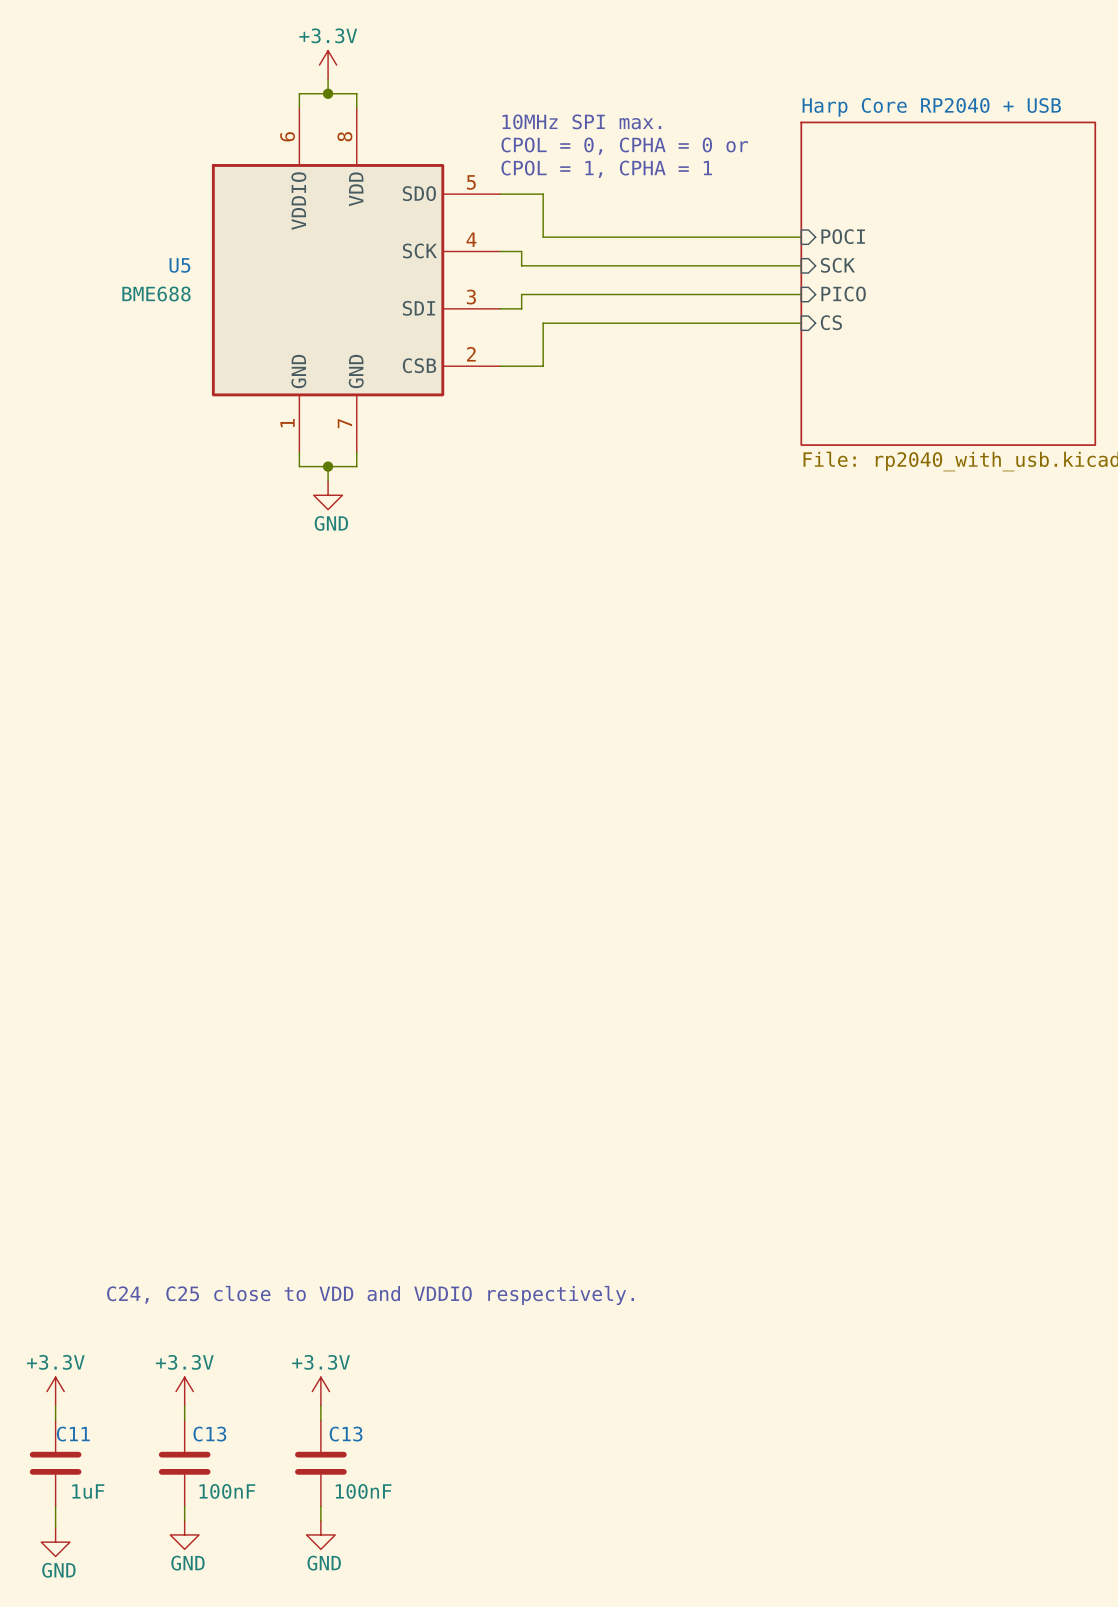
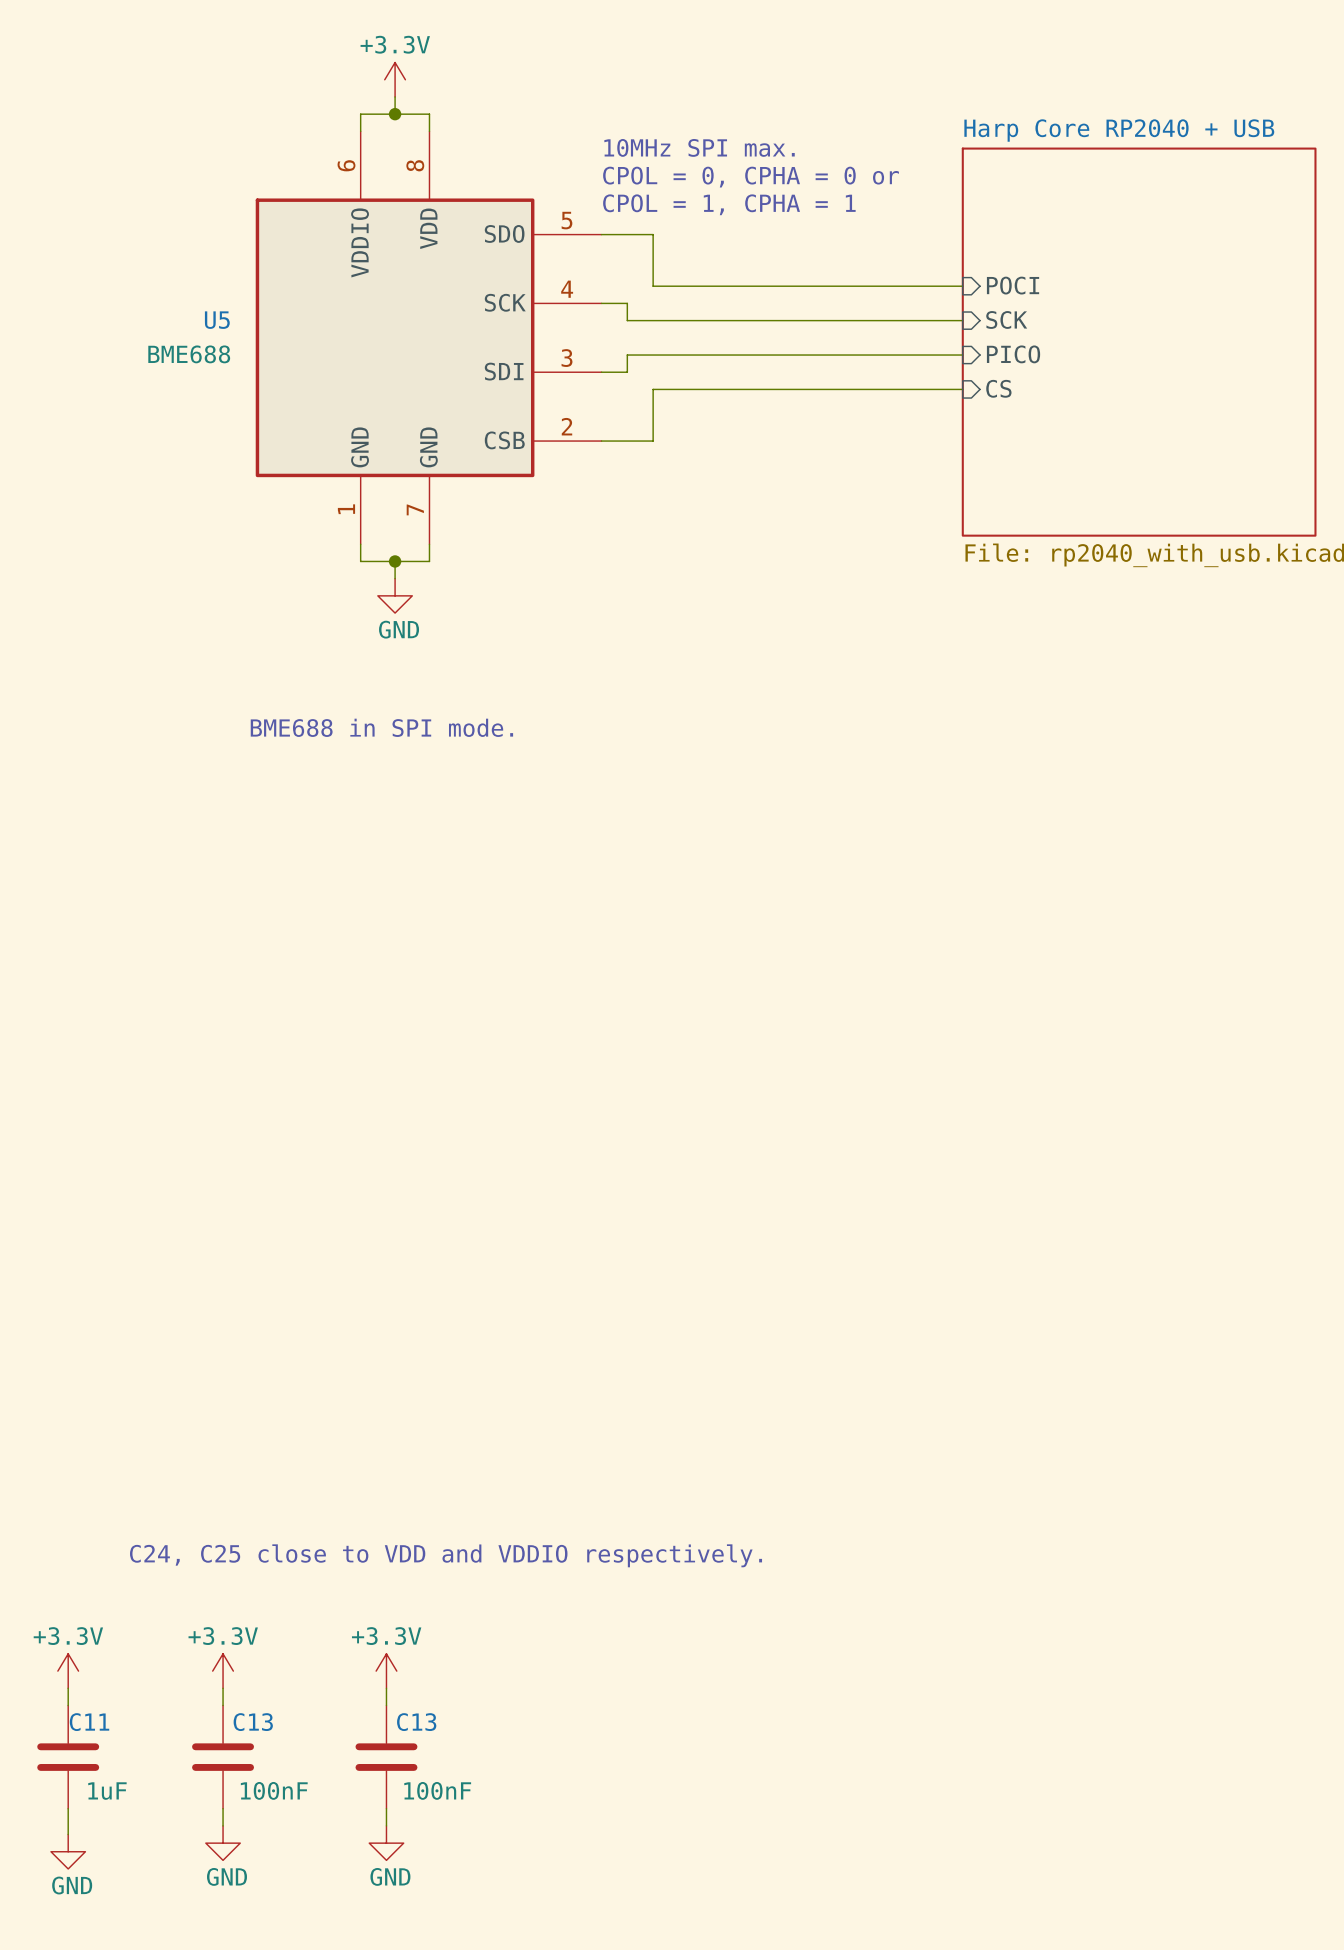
text: none -> BME688 in SPI mode. (381, 727)

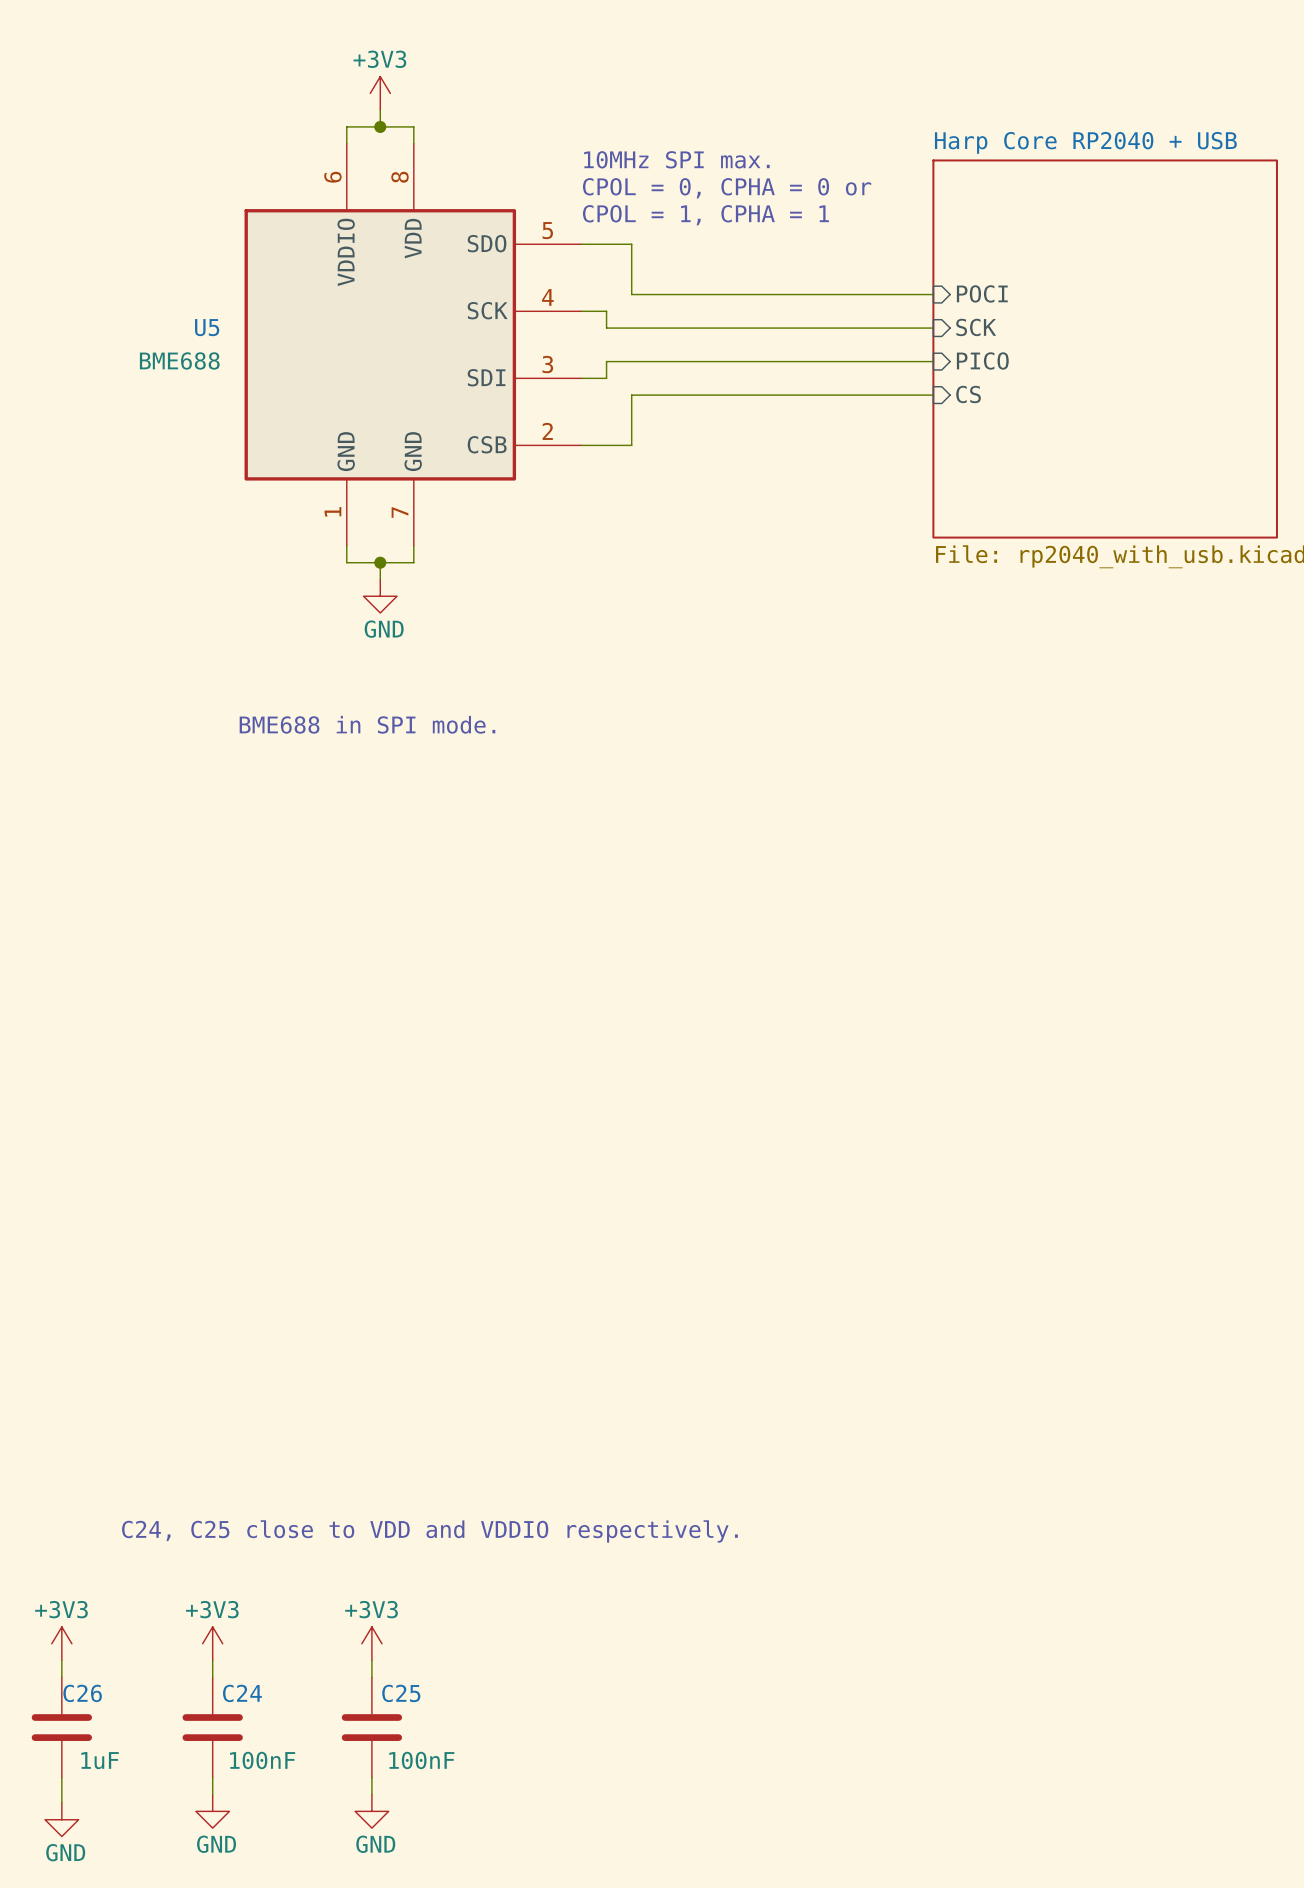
power symbol: +3.3V (395, 79) -> +3V3 (380, 93)
power symbol: +3.3V (68, 1671) -> +3V3 (61, 1643)
power symbol: +3.3V (223, 1671) -> +3V3 (212, 1643)
power symbol: +3.3V (386, 1671) -> +3V3 (371, 1643)
C11 name: C11 (89, 1722) -> C26 (82, 1693)
C13 name: C13 (253, 1722) -> C24 (242, 1693)
C13 name: C13 (416, 1722) -> C25 (401, 1693)

